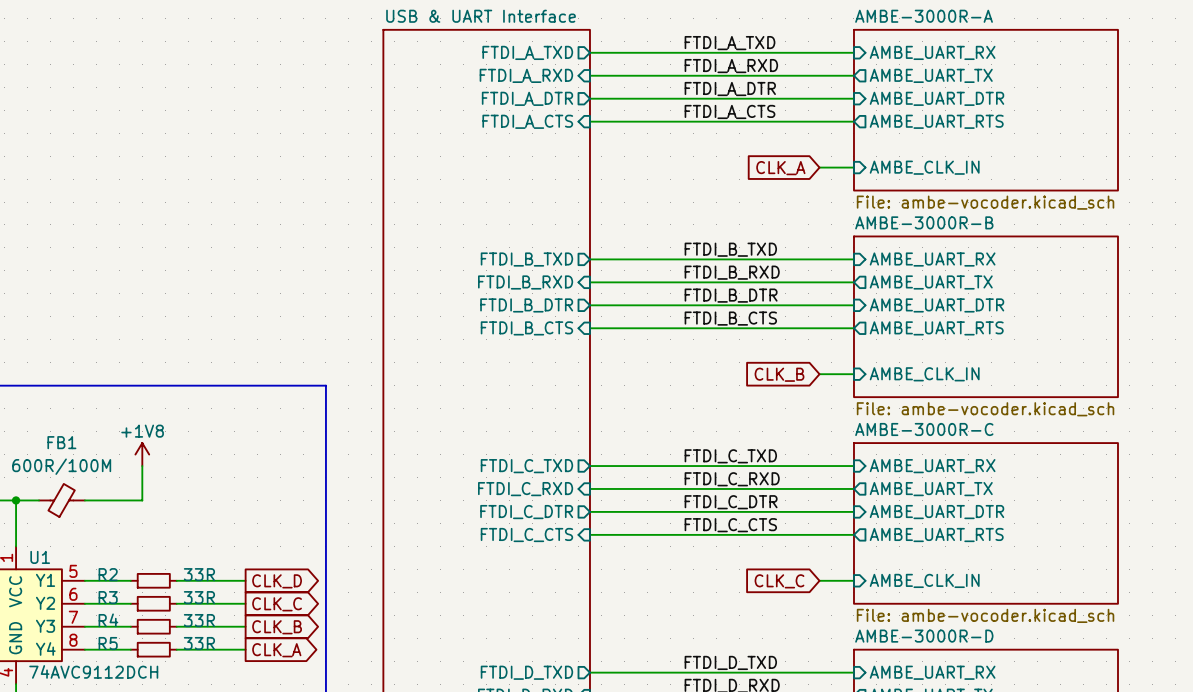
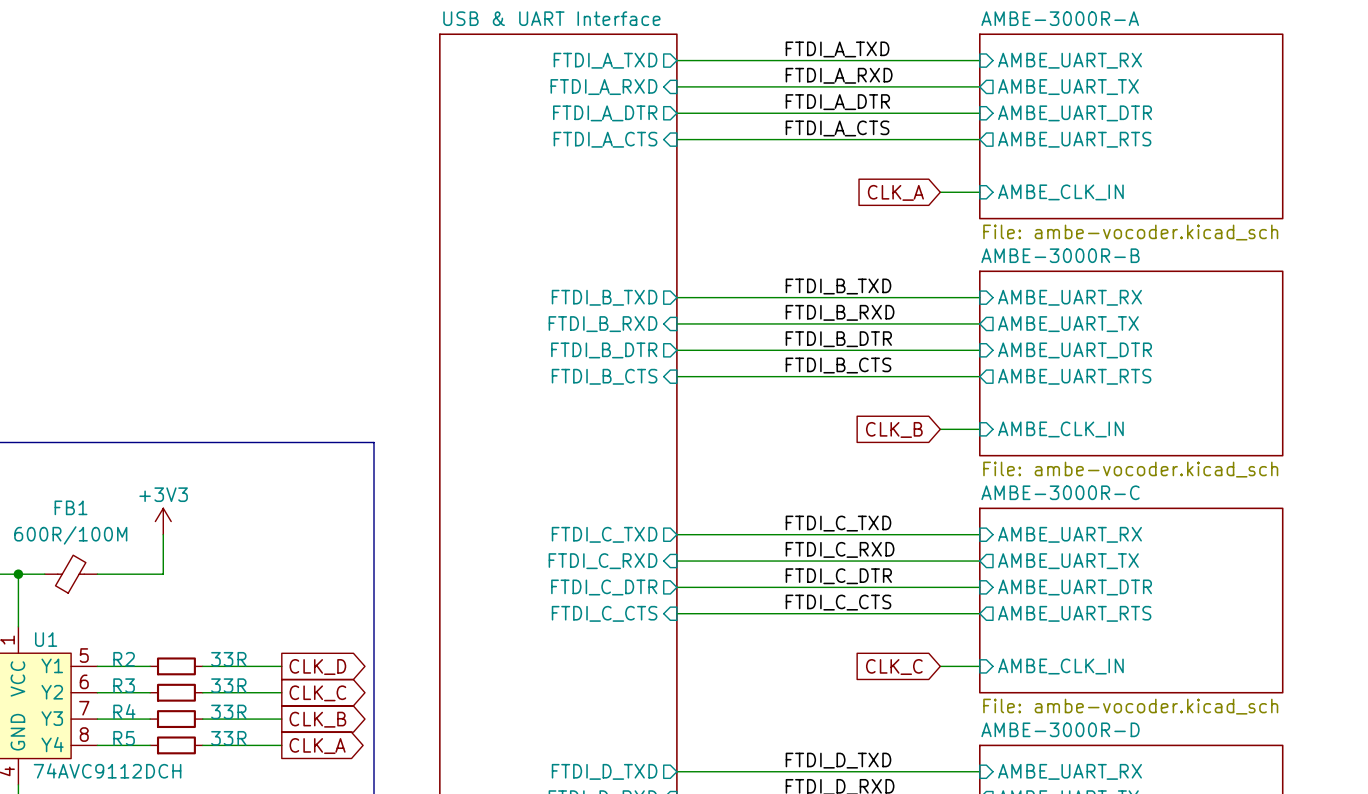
power symbol: +1V8 (142, 454) -> +3V3 (163, 521)

